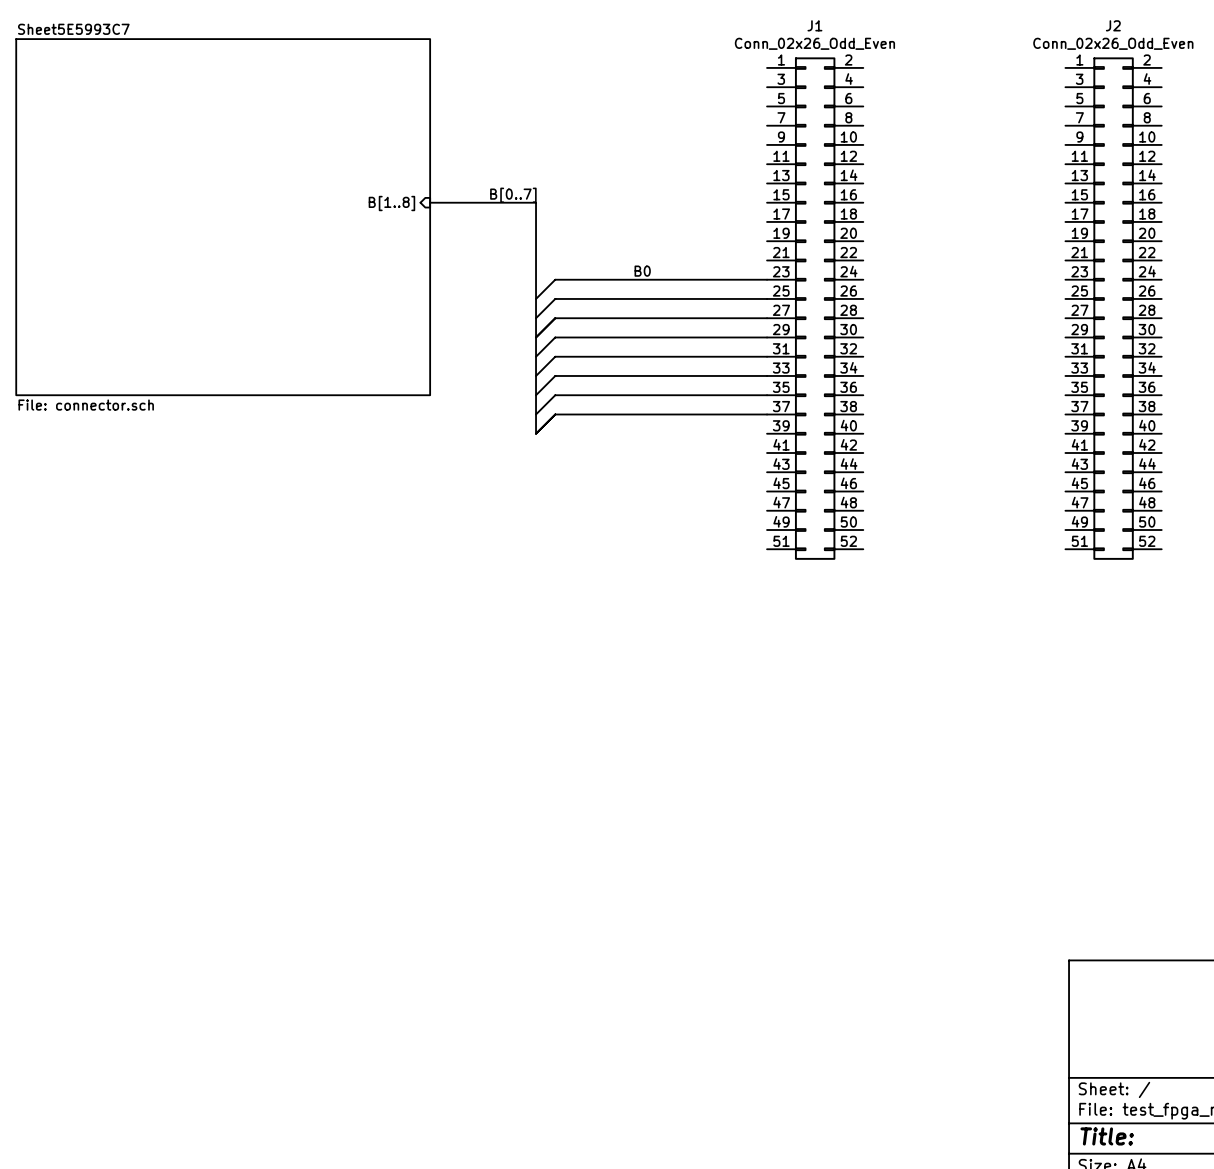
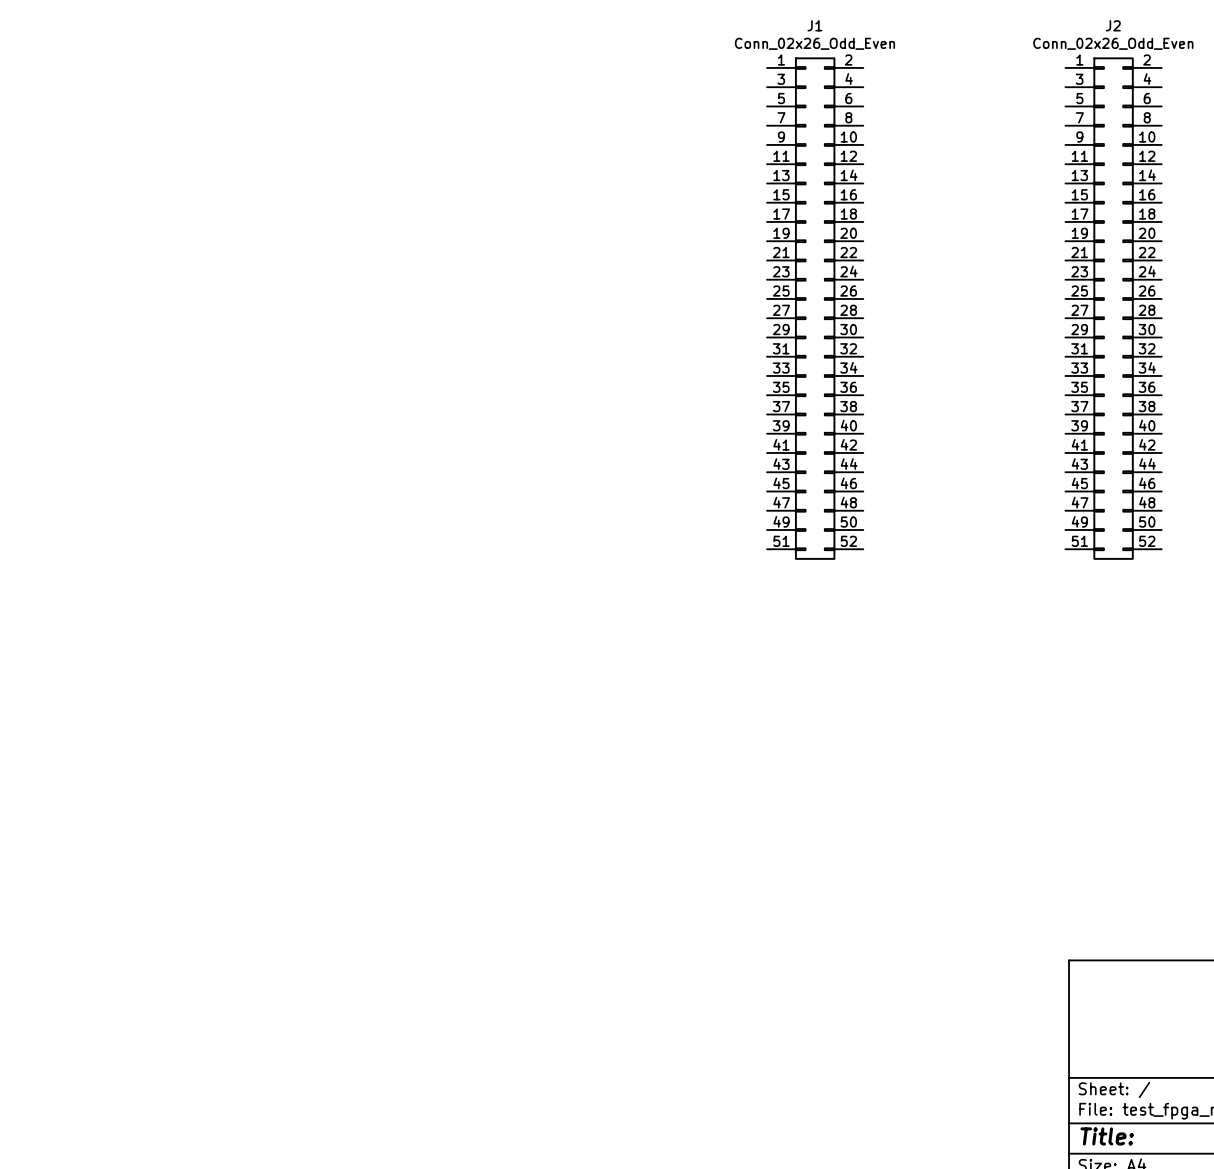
label: B[0..7] (513, 195) -> none
bus: (430, 202) (536, 202) (536, 433) -> none
sheet pin: B[1..8] (391, 203) -> none
sheet Sheet5E5993C7: File: connector.sch (223, 217) -> none
label: B0 (642, 271) -> none
wire: (767, 279) (555, 279) (536, 298) -> none
wire: (767, 298) (555, 298) (536, 318) -> none
wire: (767, 318) (555, 318) (536, 337) -> none
wire: (767, 337) (555, 337) (536, 356) -> none
wire: (767, 356) (555, 356) (536, 375) -> none
wire: (767, 375) (555, 375) (536, 395) -> none
wire: (767, 395) (555, 395) (536, 414) -> none
wire: (767, 414) (555, 414) (536, 433) -> none

